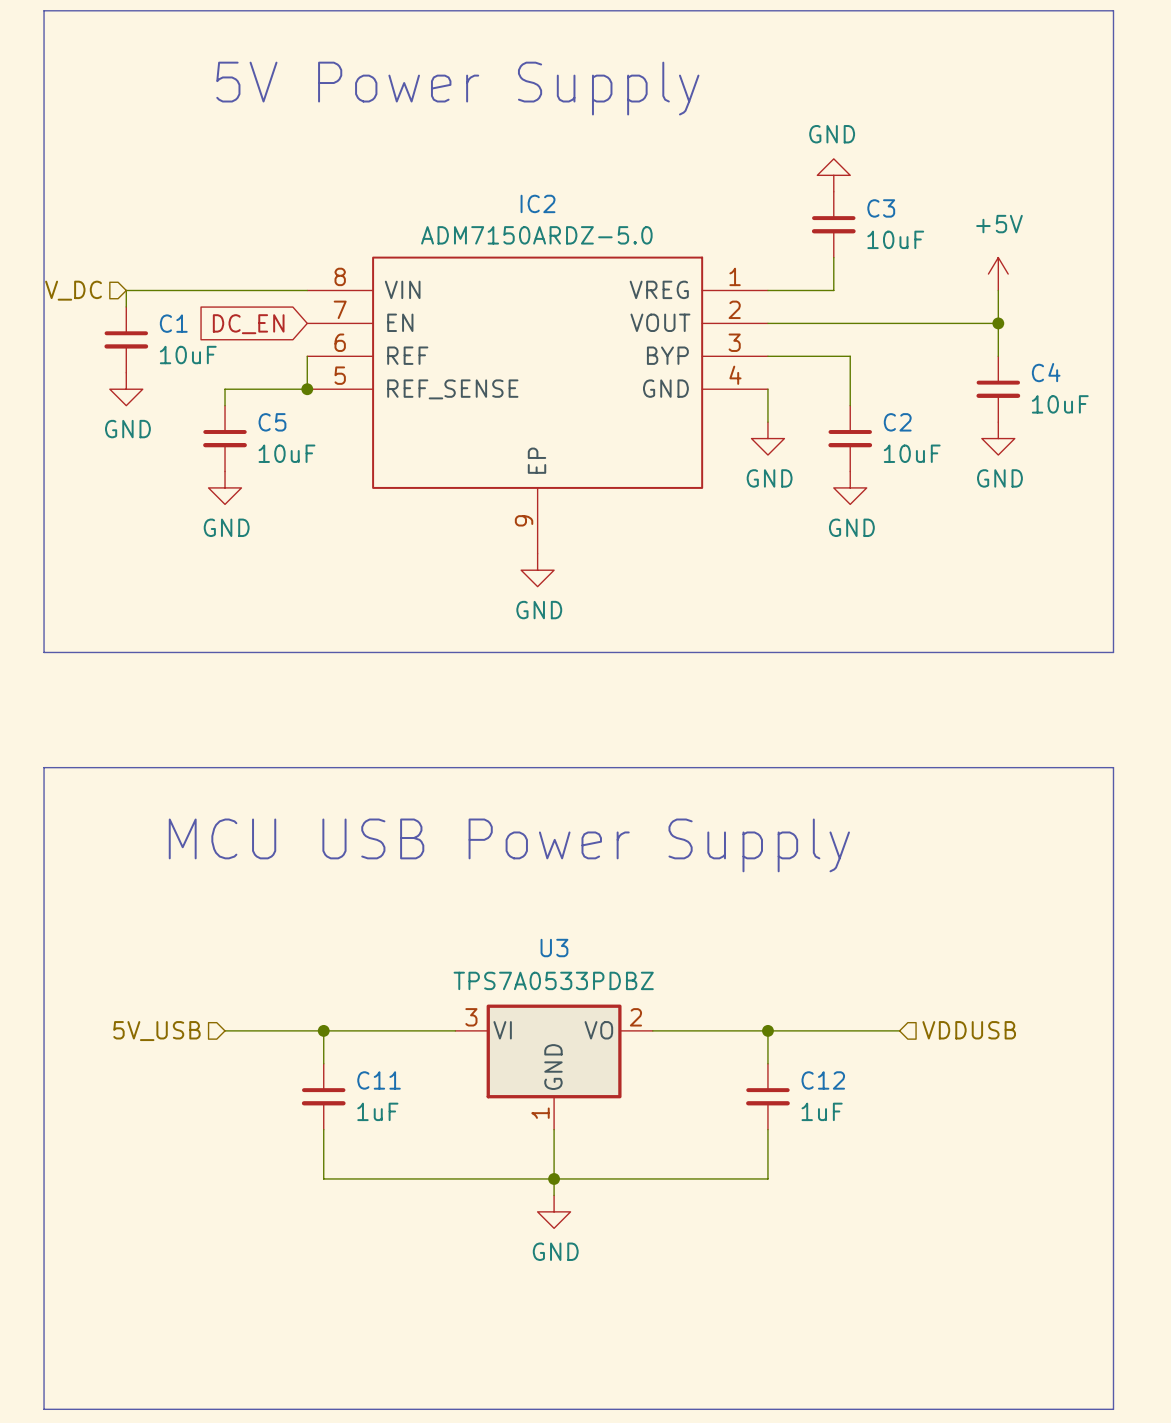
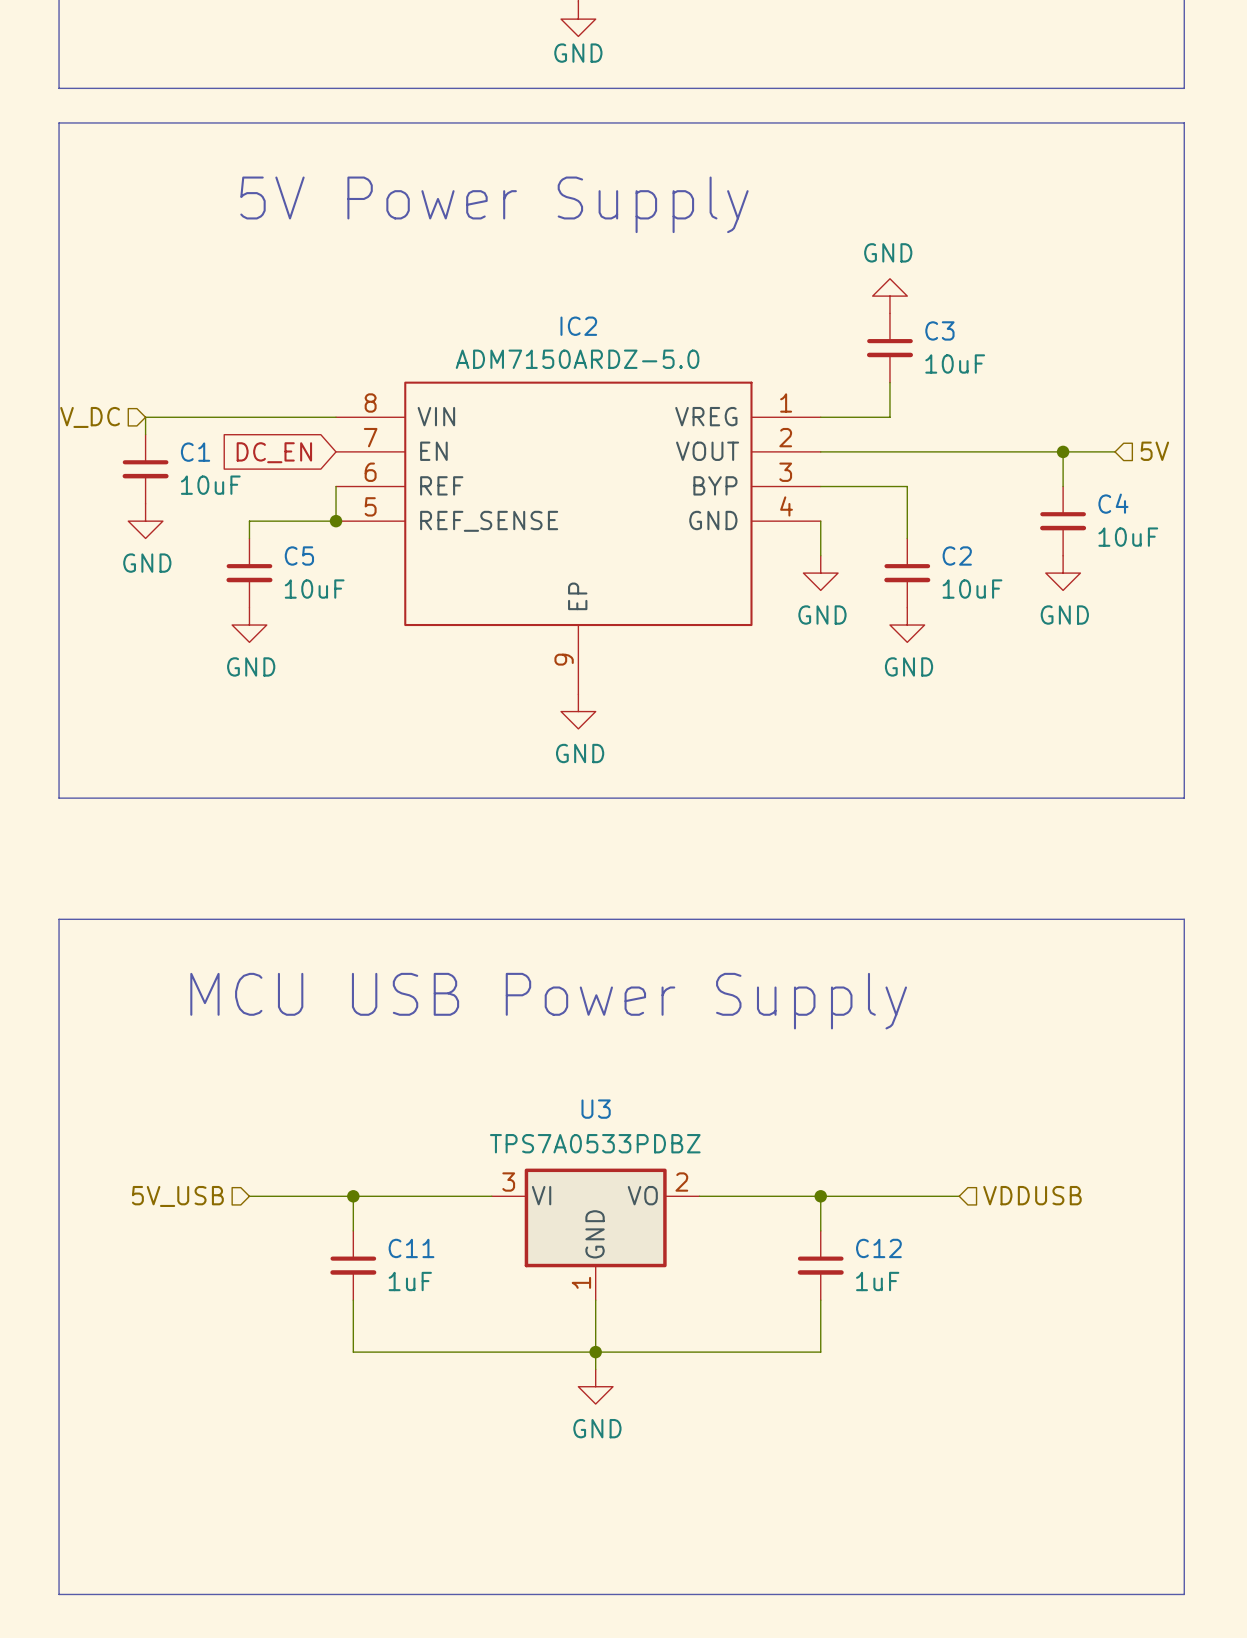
power symbol: +5V (998, 274) -> none
wire: (998, 290) (998, 323) -> (1115, 451) (1063, 451)
hierarchical label: none -> 5V (1154, 451)

